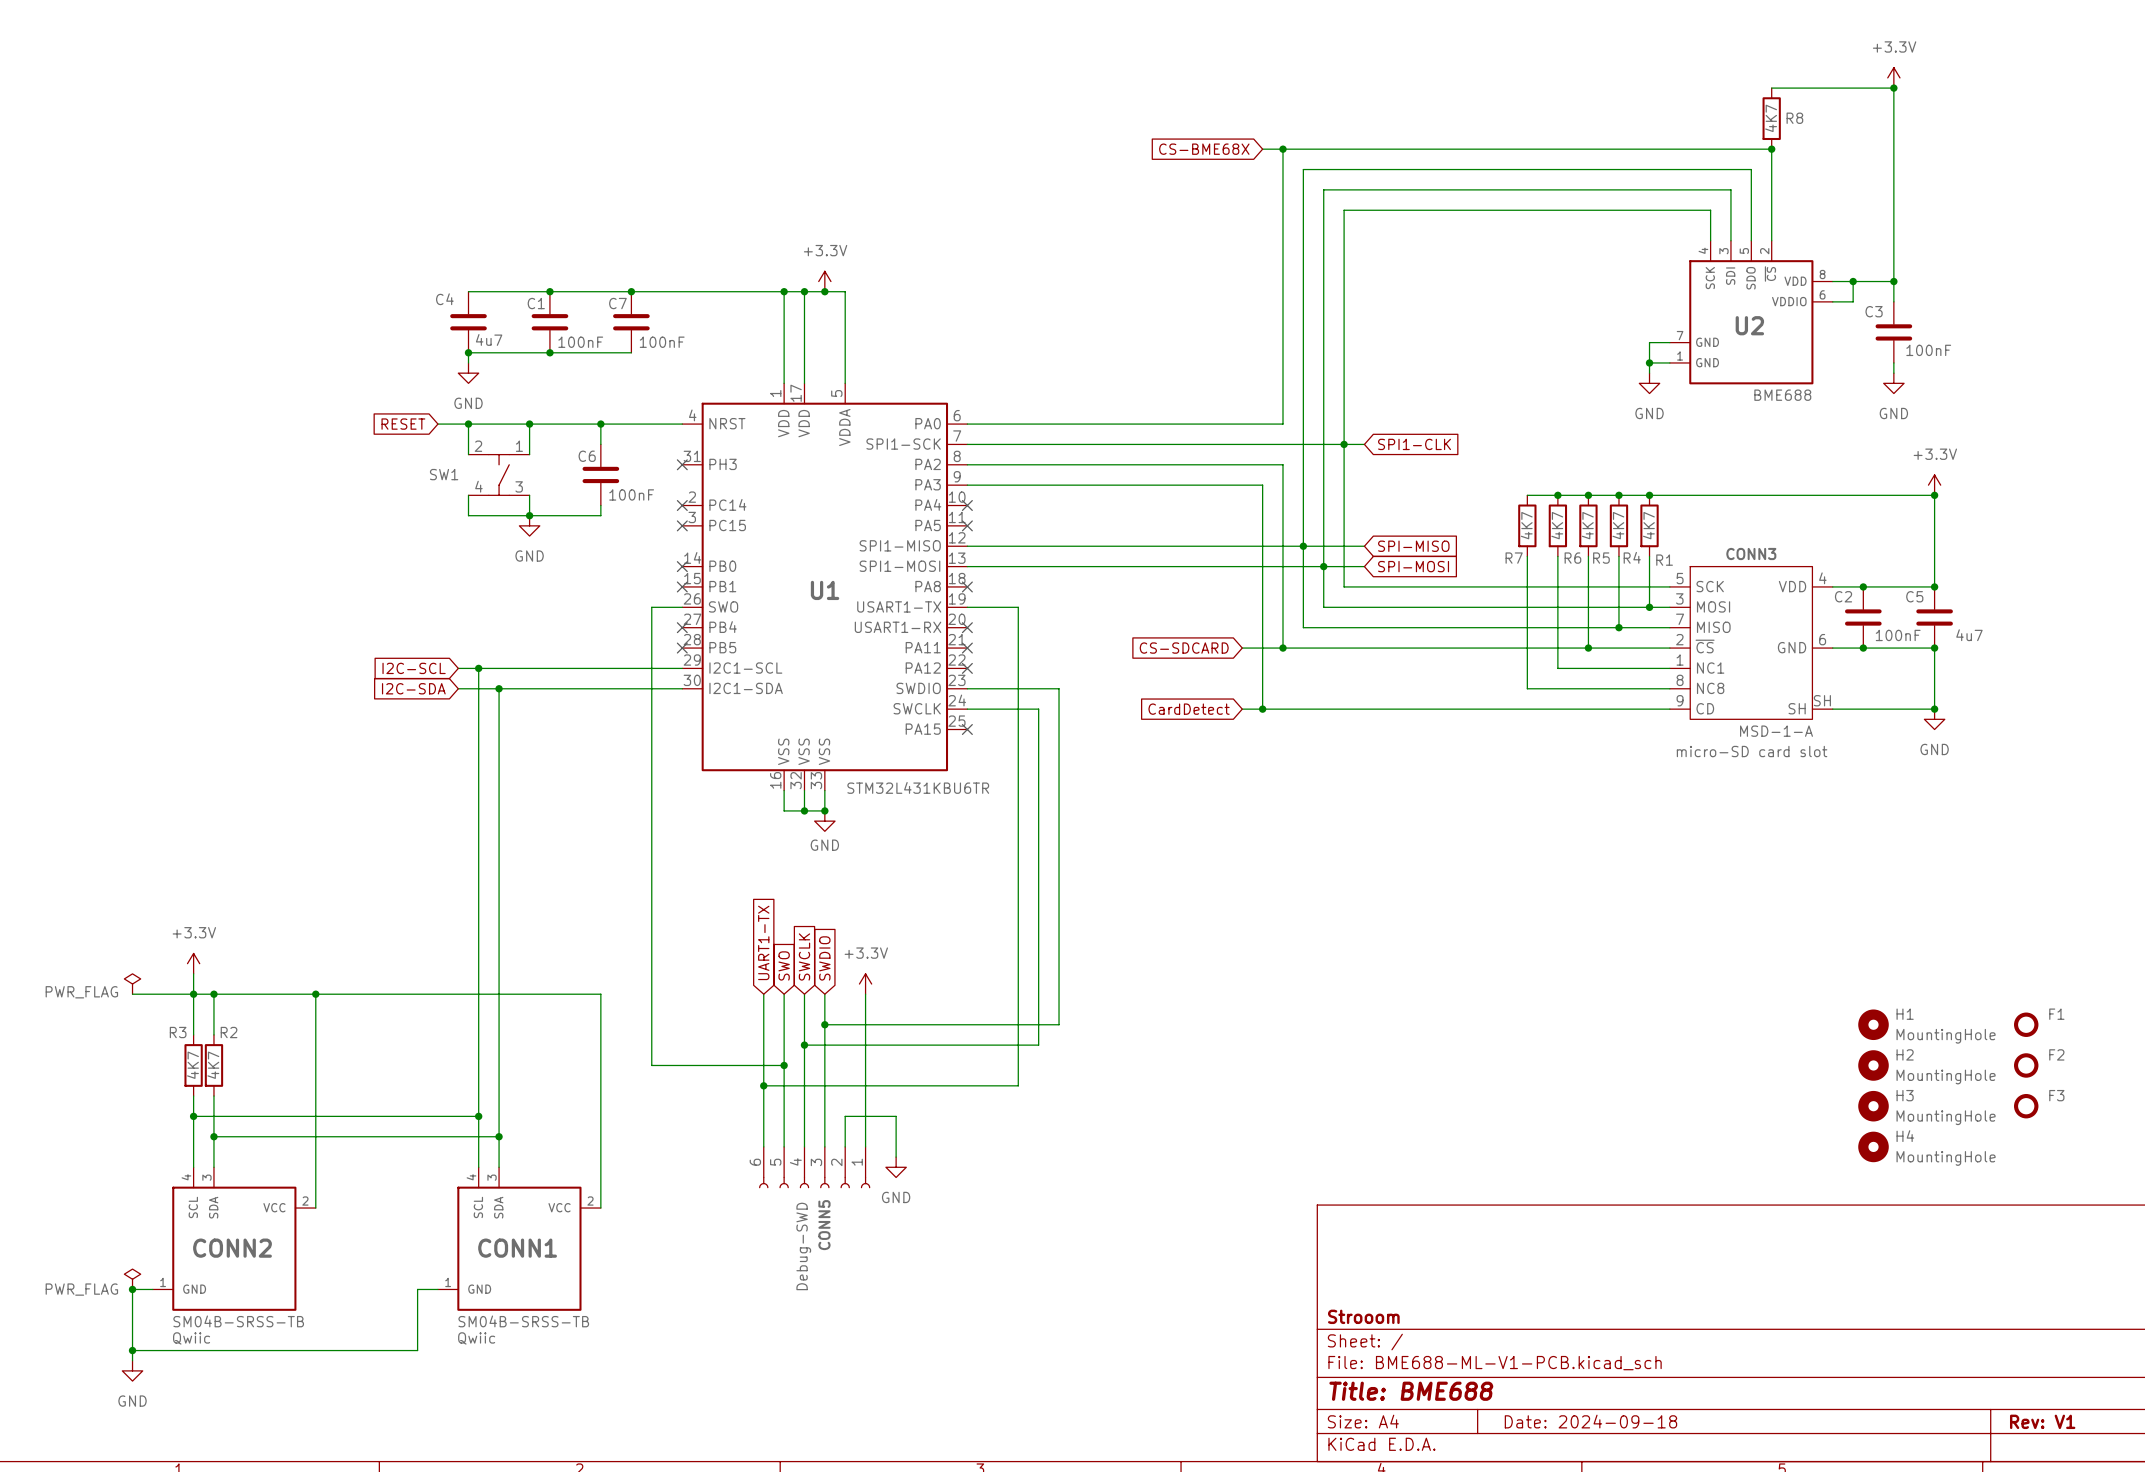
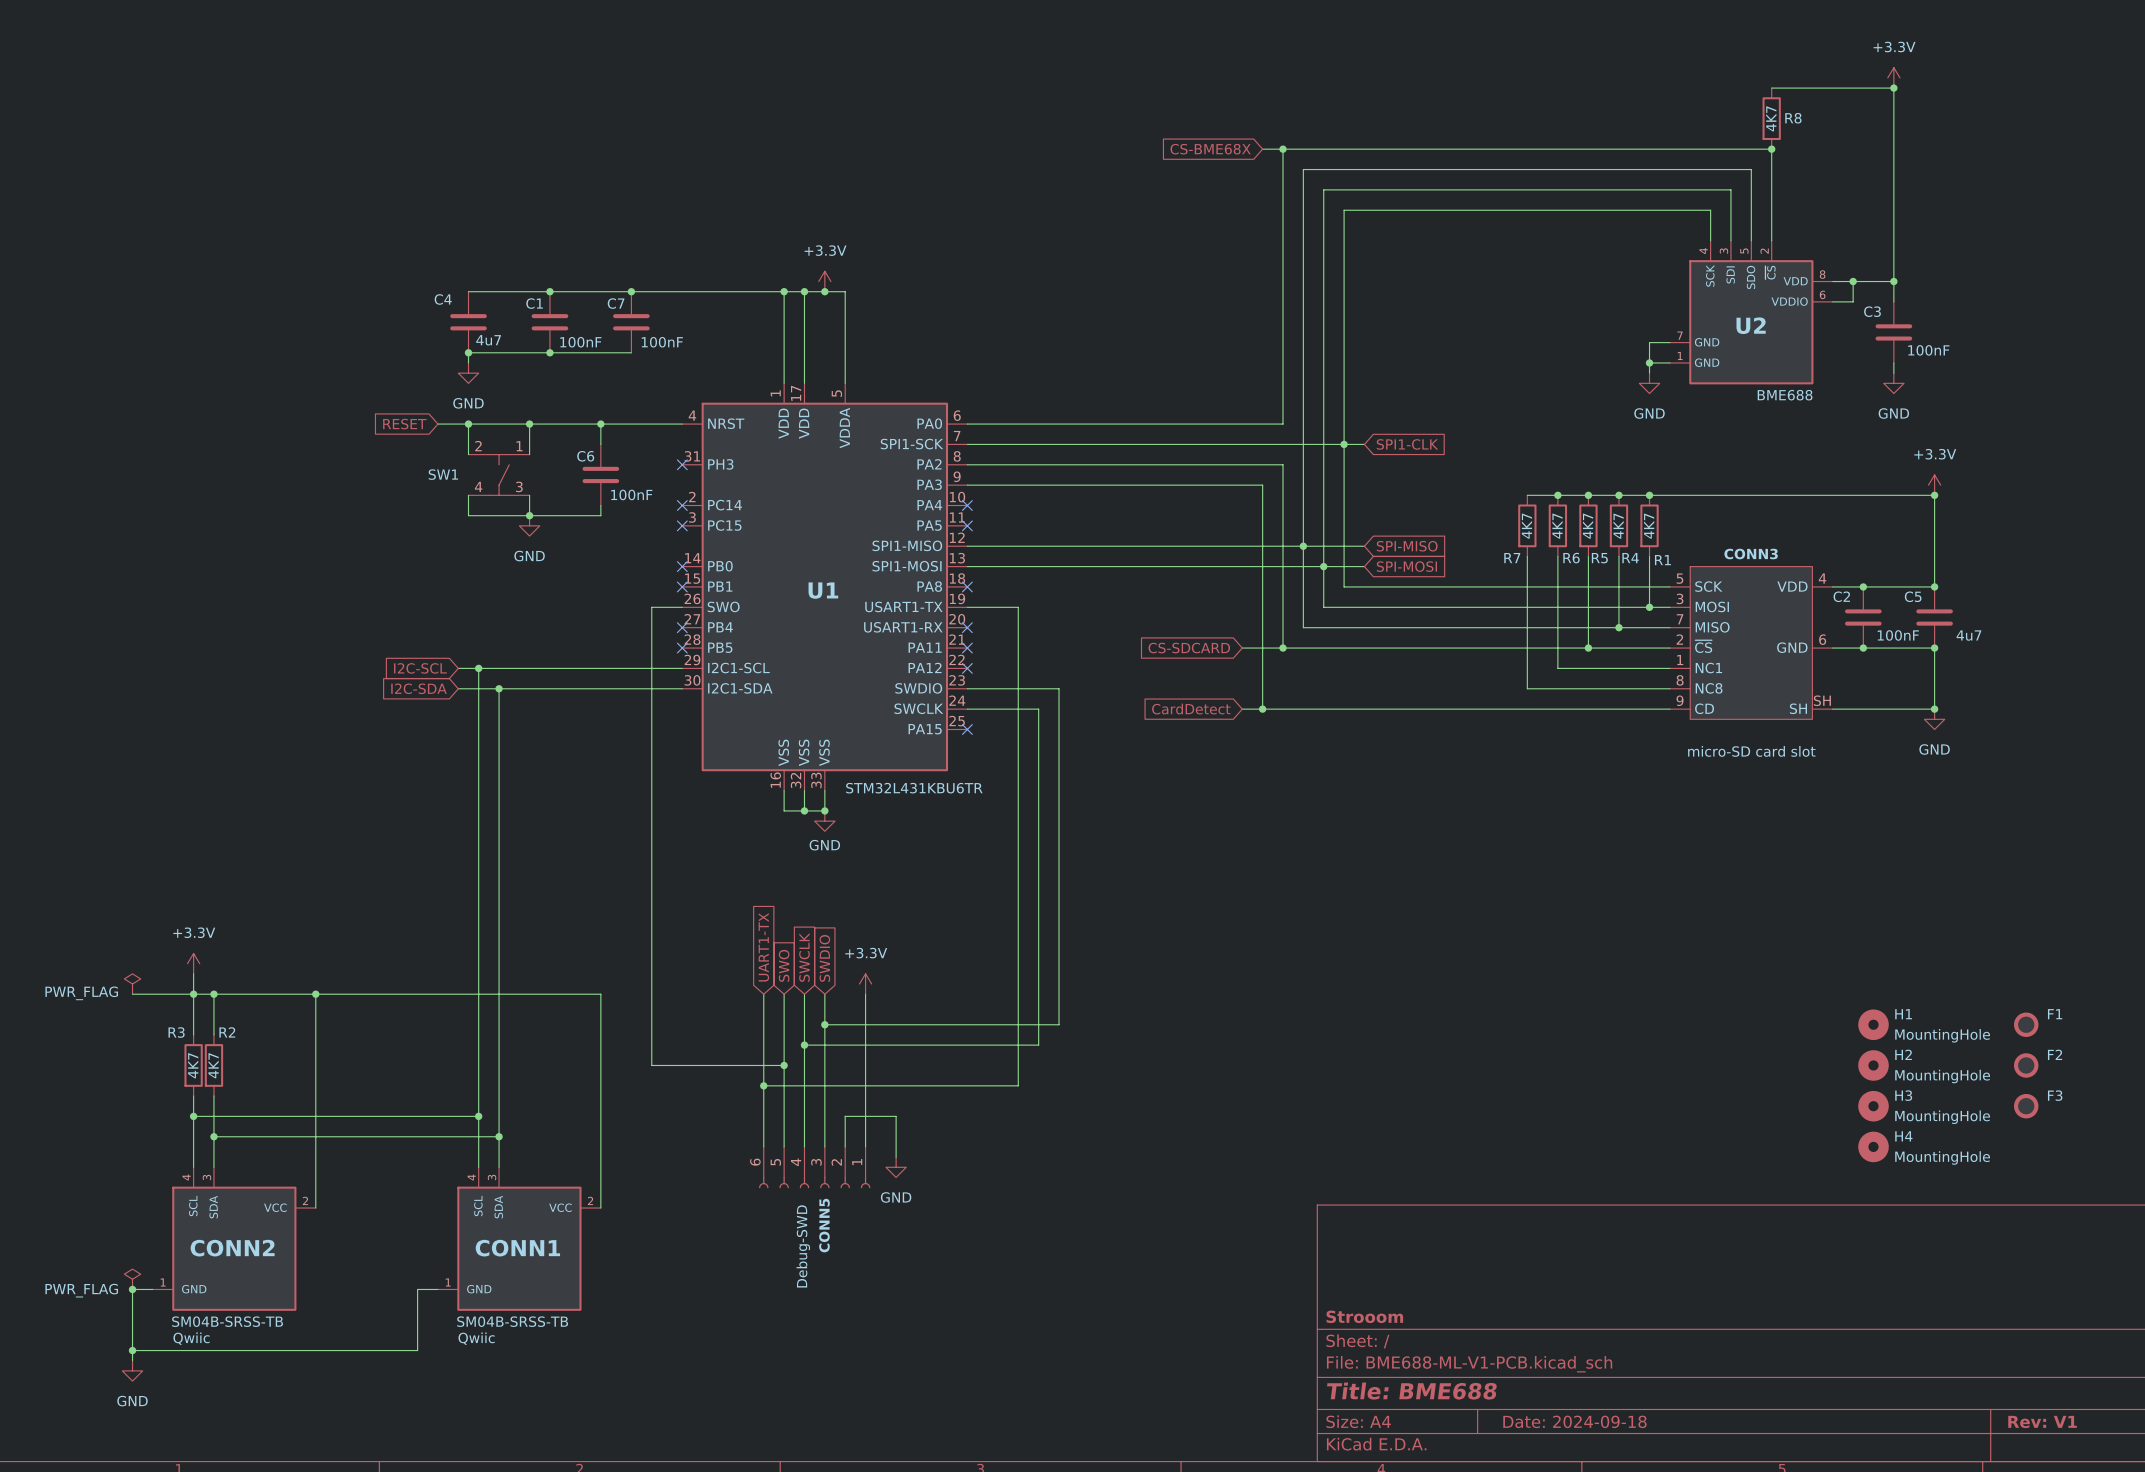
CONN3 text: MSD-1-A (1776, 731) -> none

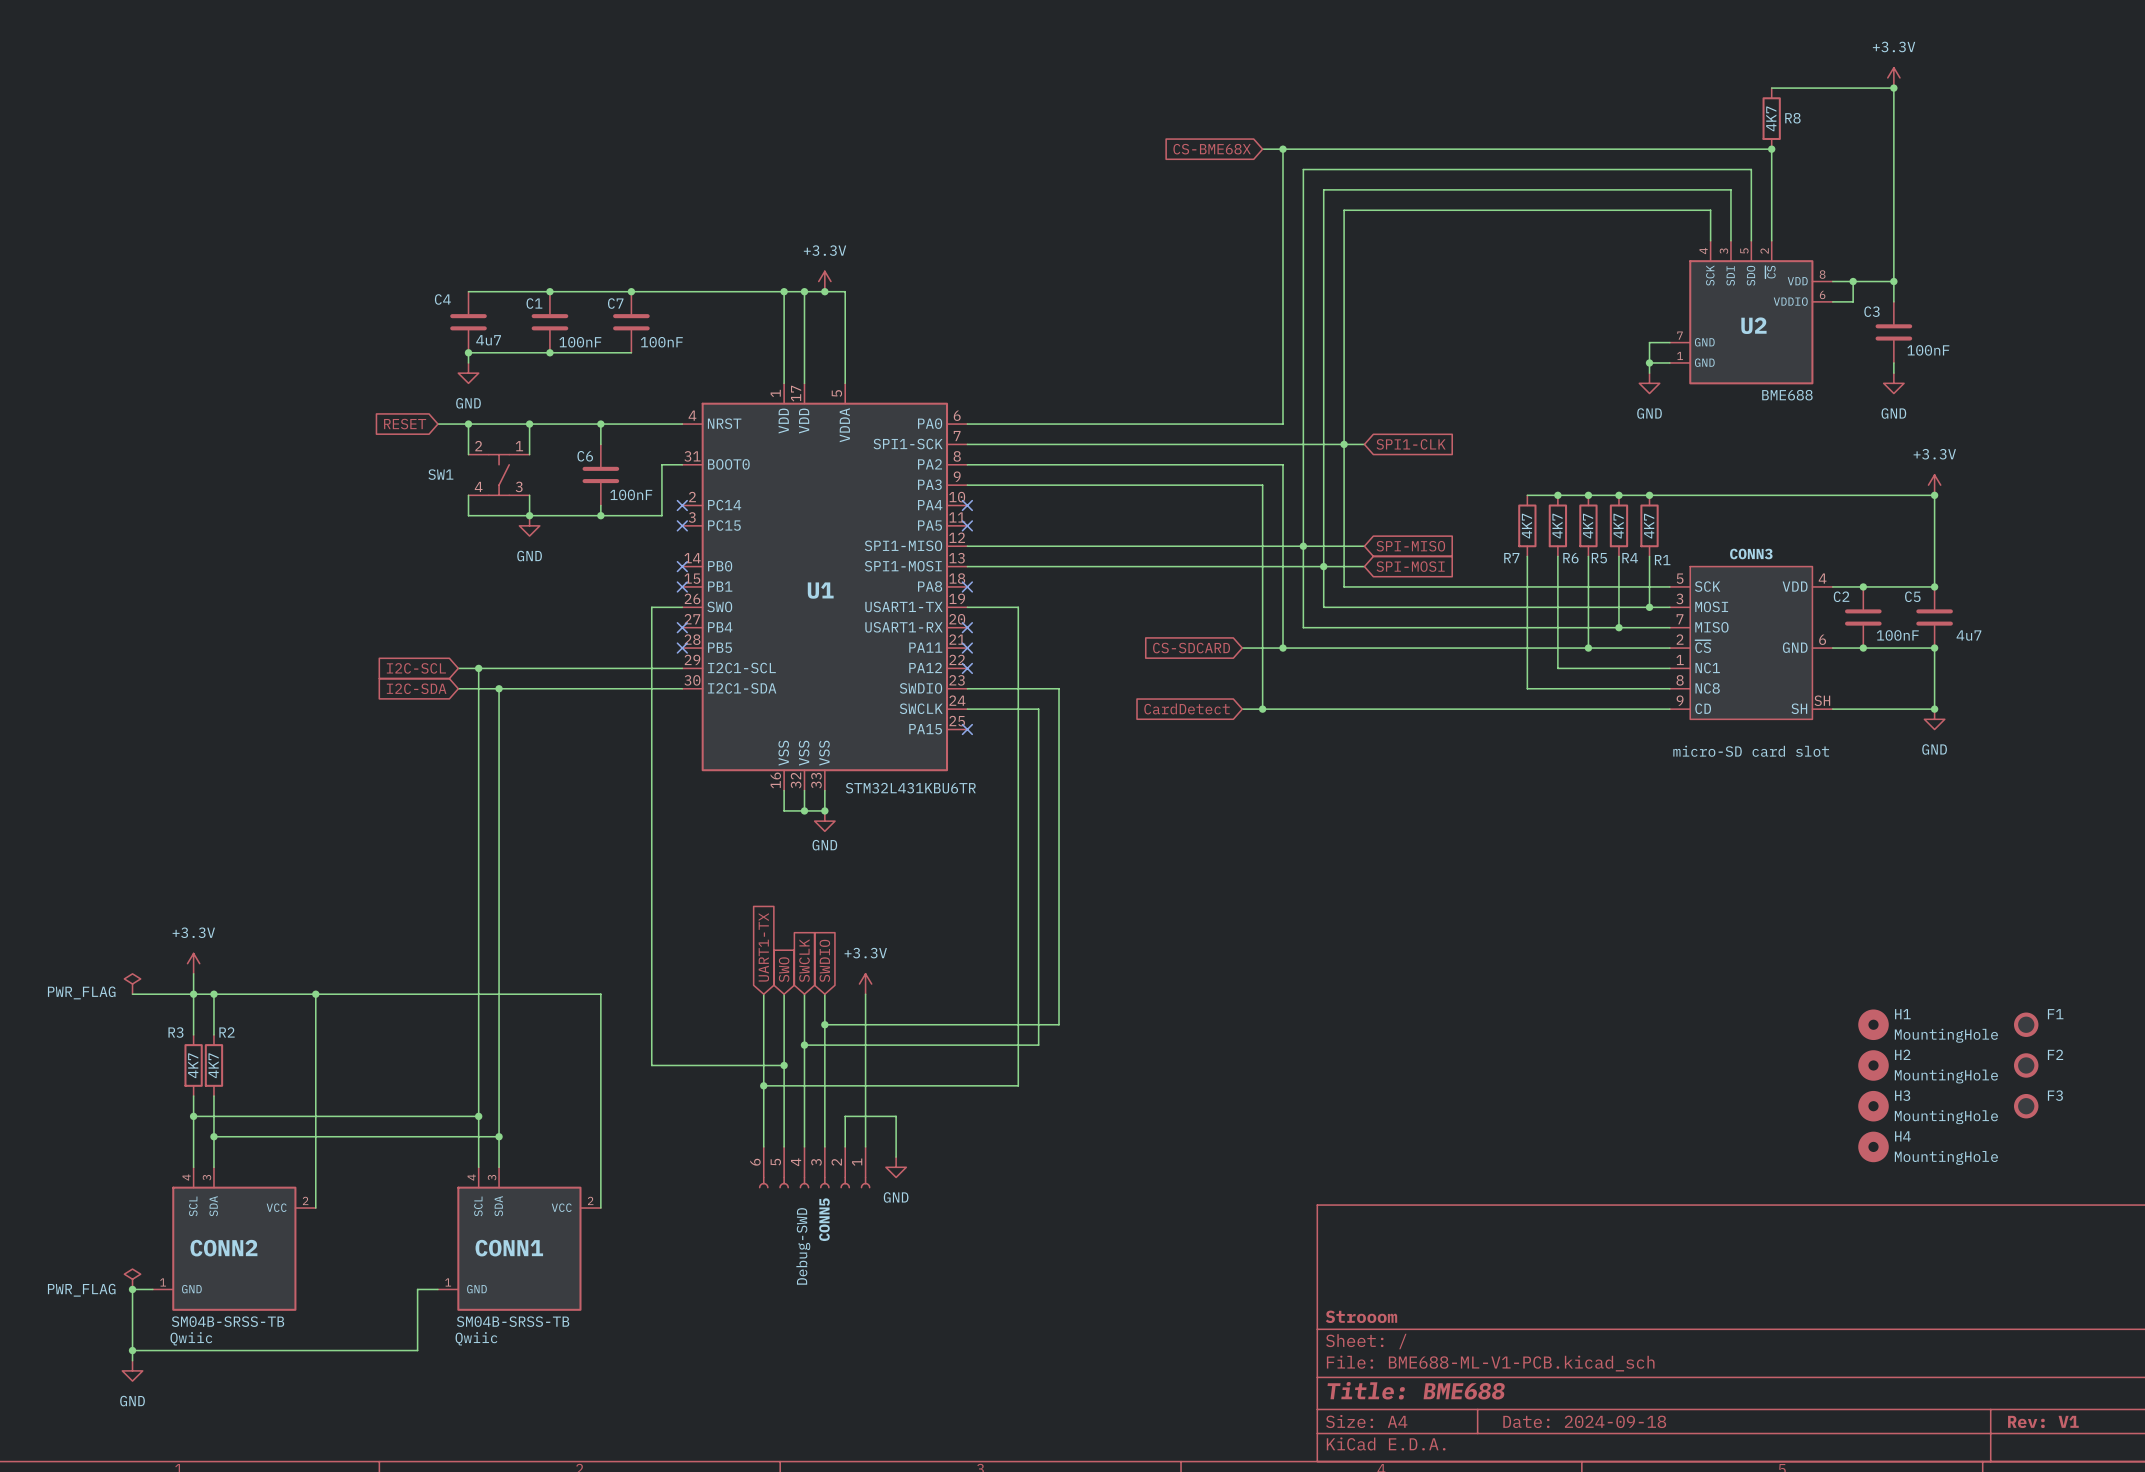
wire: none -> (682, 464) (661, 464) (661, 515) (600, 515)
no-connect mark: (682, 464) -> none
U1 pin name: PH3 (720, 464) -> BOOT0 (728, 464)
junction: none -> (600, 515)

